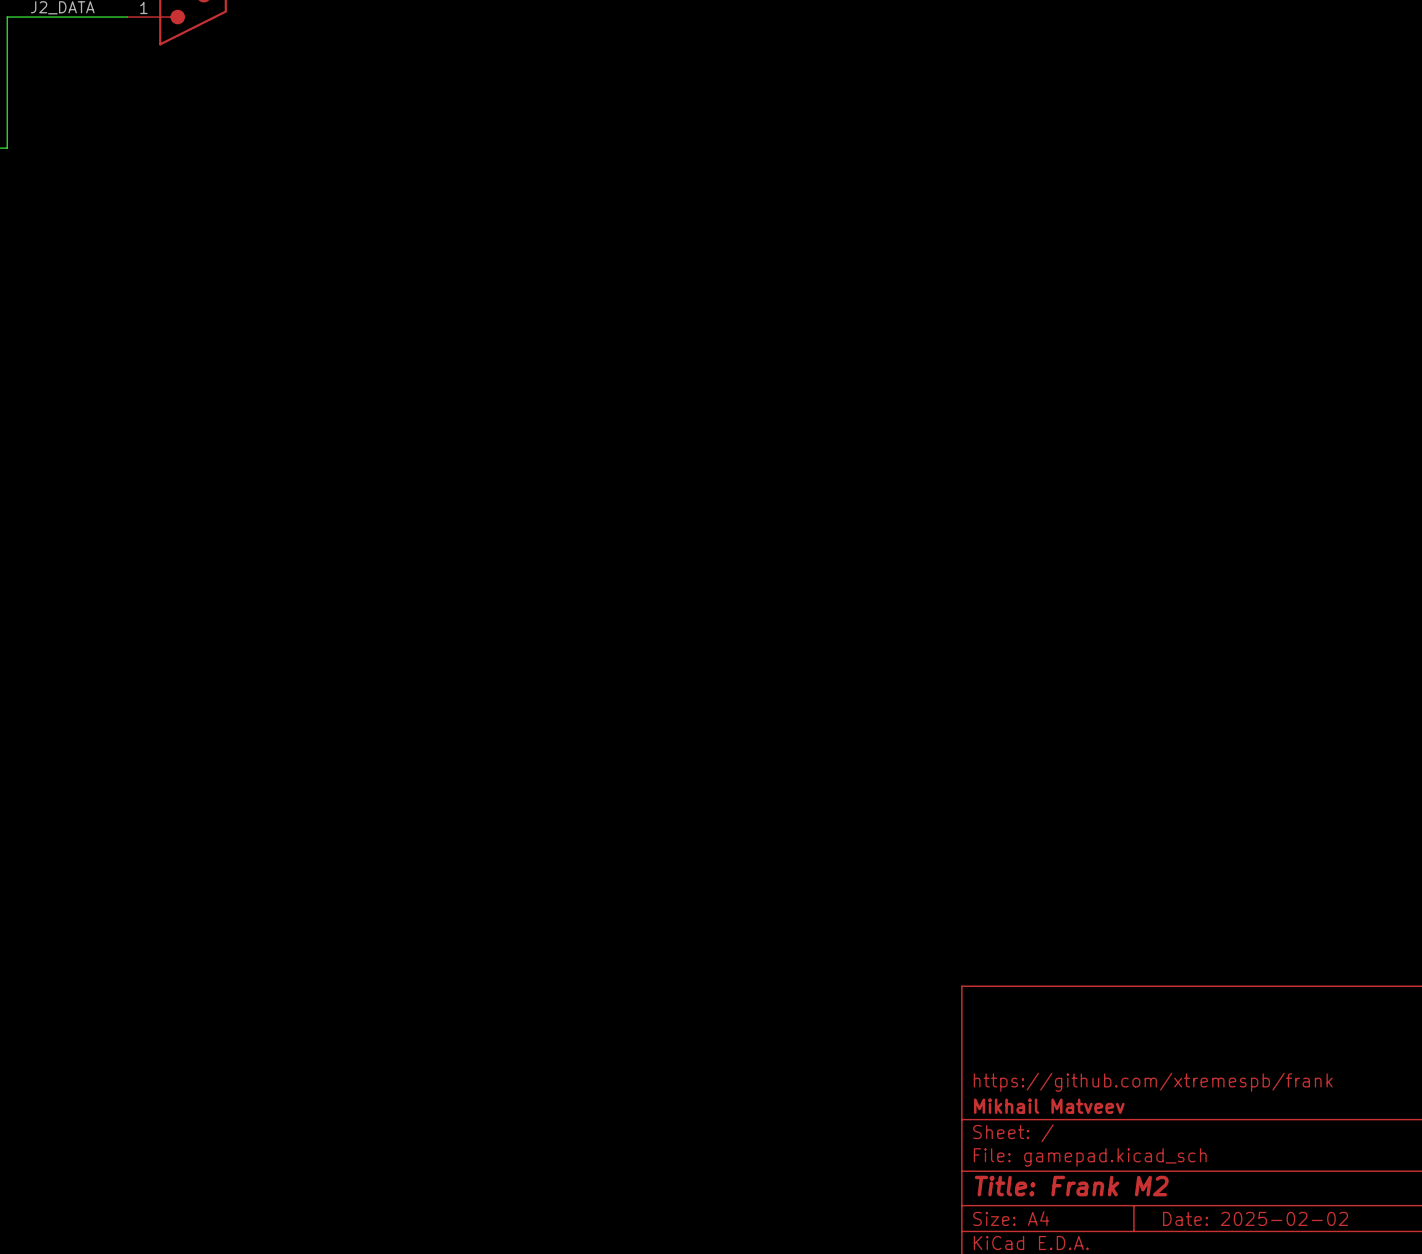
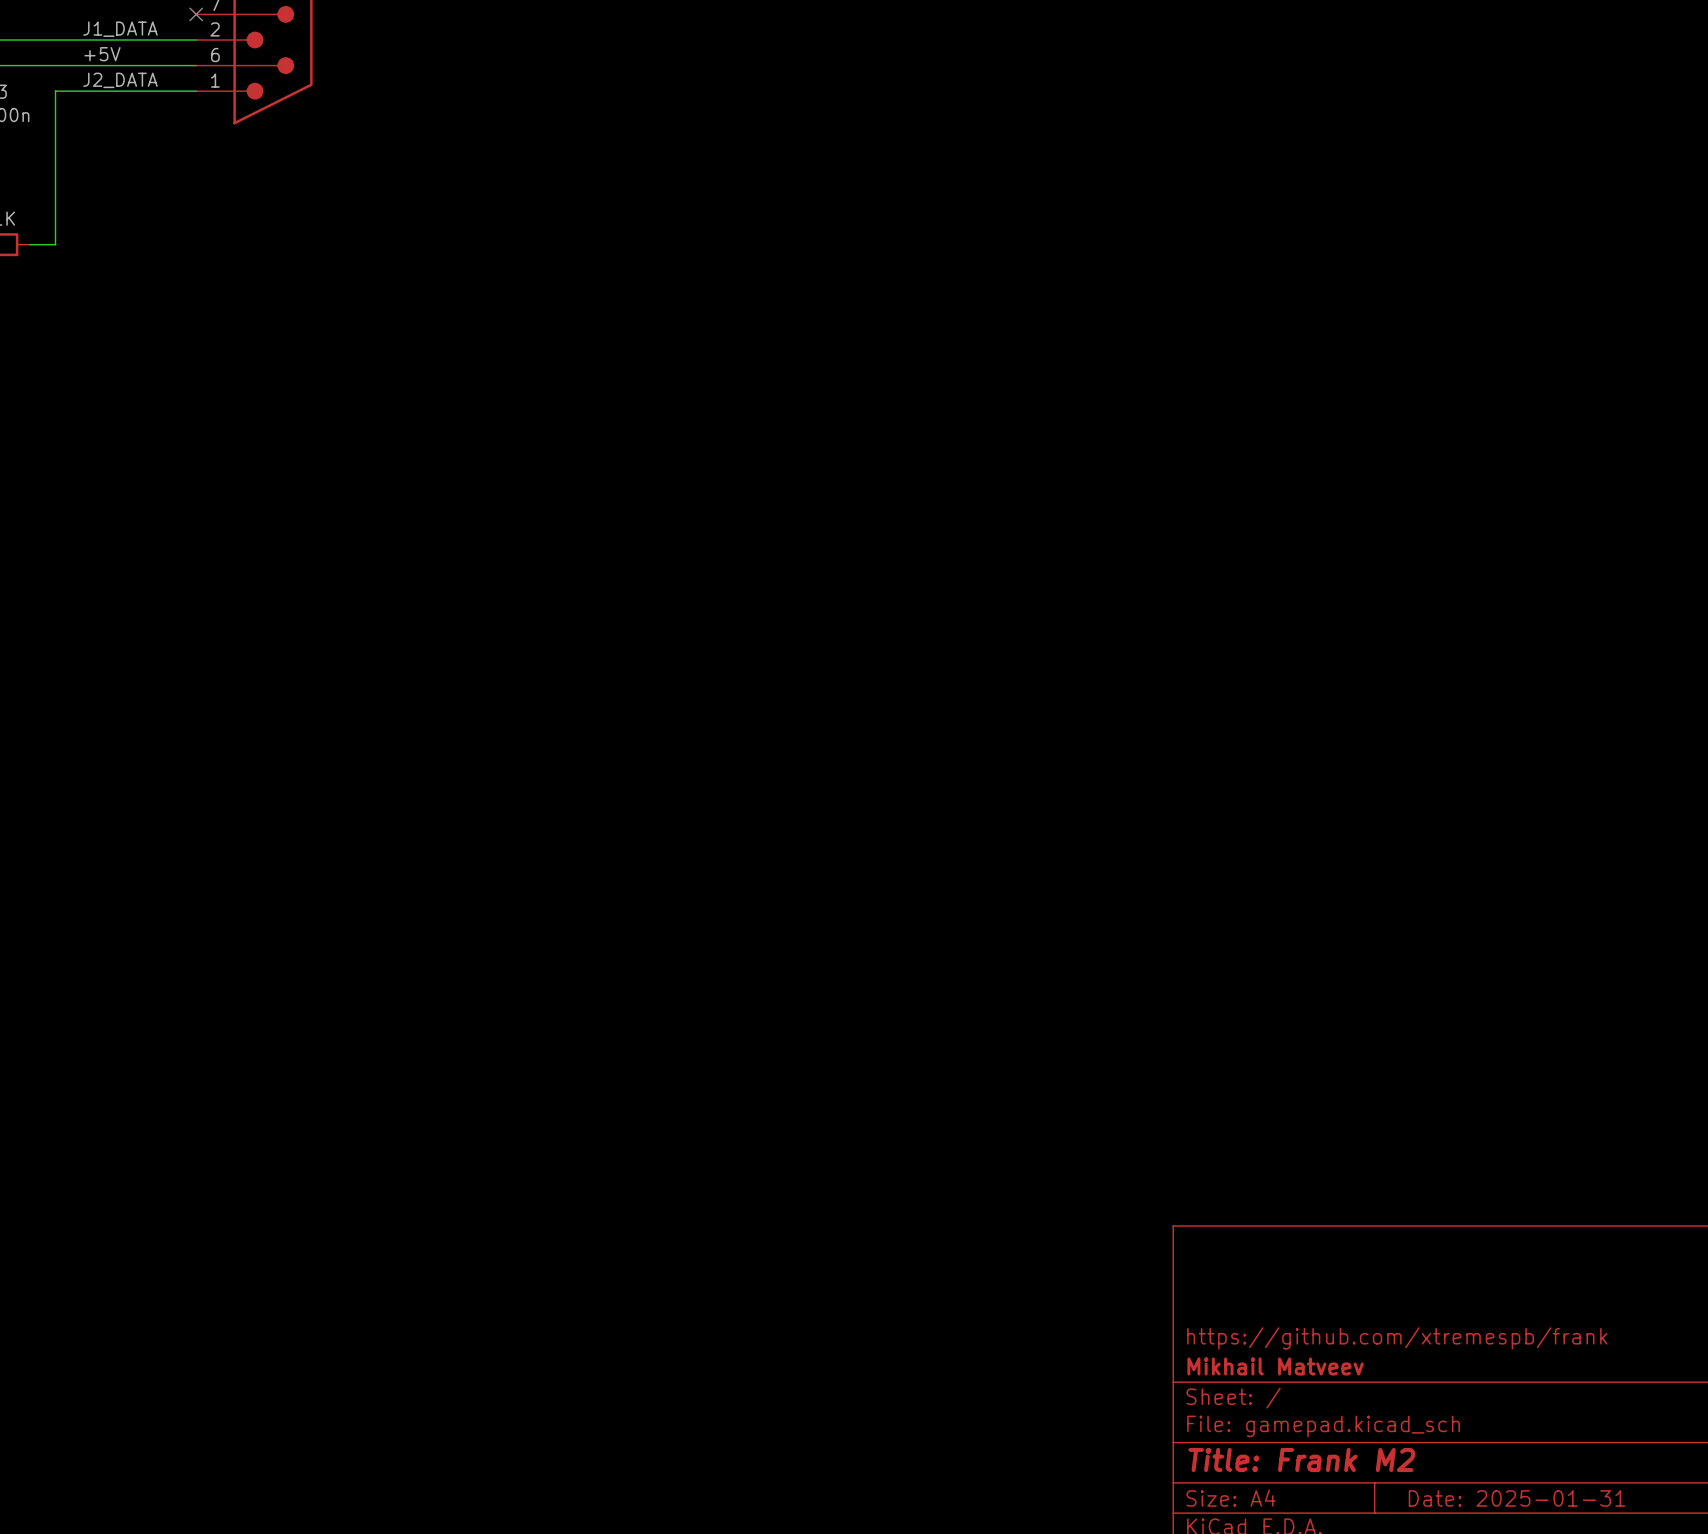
title block: Date: 2025-02-02 (1255, 1218) -> Date: 2025-01-31 (1517, 1498)

